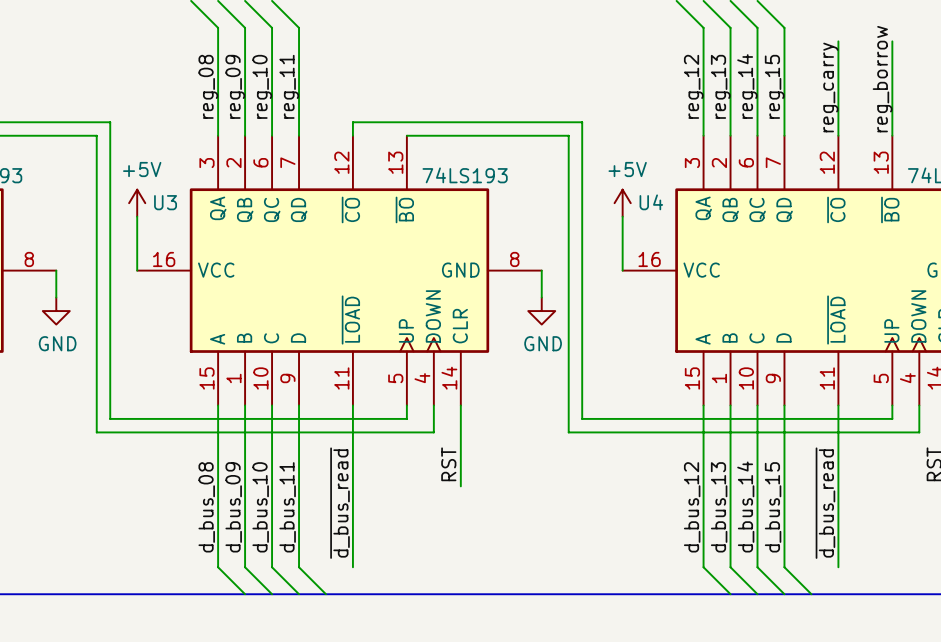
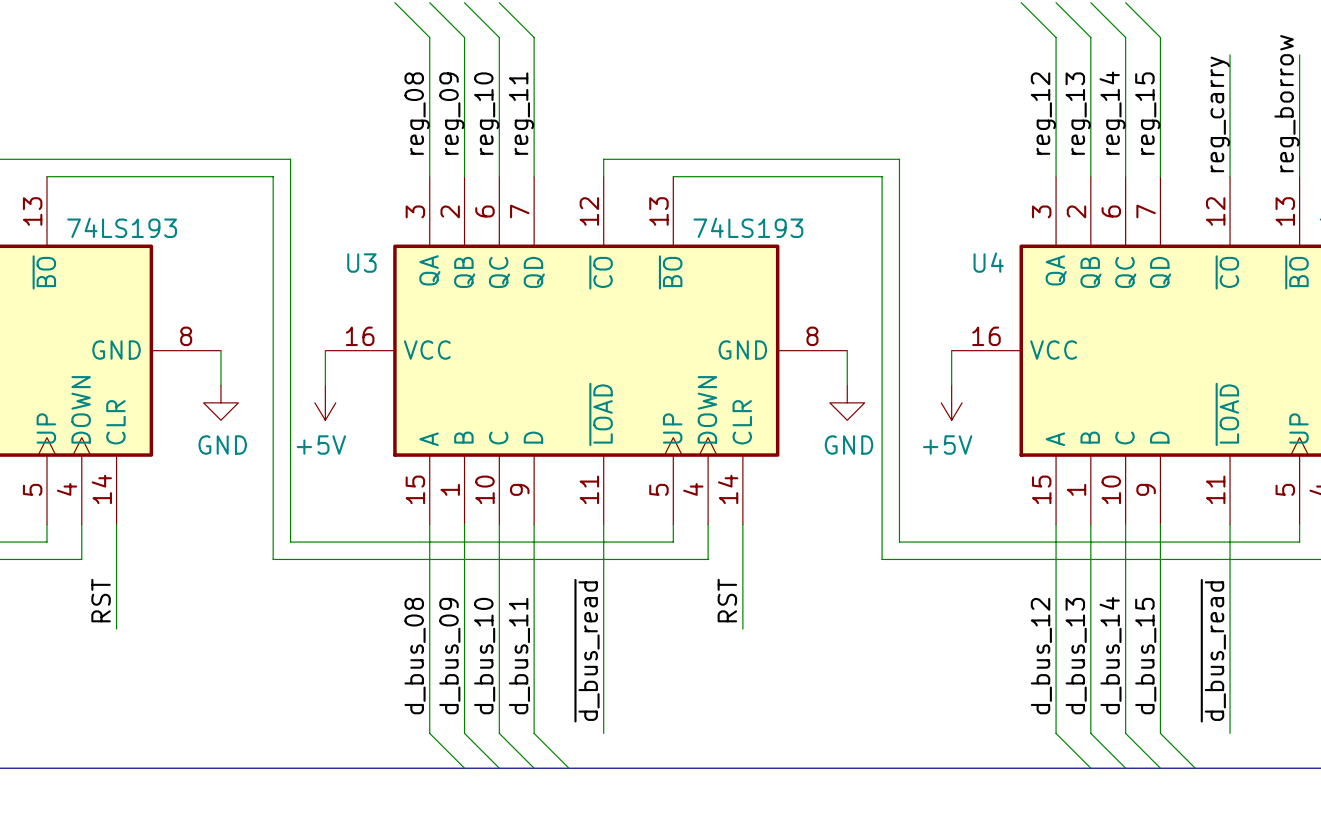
power symbol rotation: 0° (137, 203) -> 180° (325, 402)
power symbol position: +5V (137, 203) -> +5V (325, 402)
power symbol rotation: 0° (622, 203) -> 180° (951, 402)
power symbol position: +5V (622, 203) -> +5V (951, 402)
wire: (137, 216) (137, 270) -> (325, 385) (325, 350)
wire: (622, 216) (622, 270) -> (951, 385) (951, 350)

